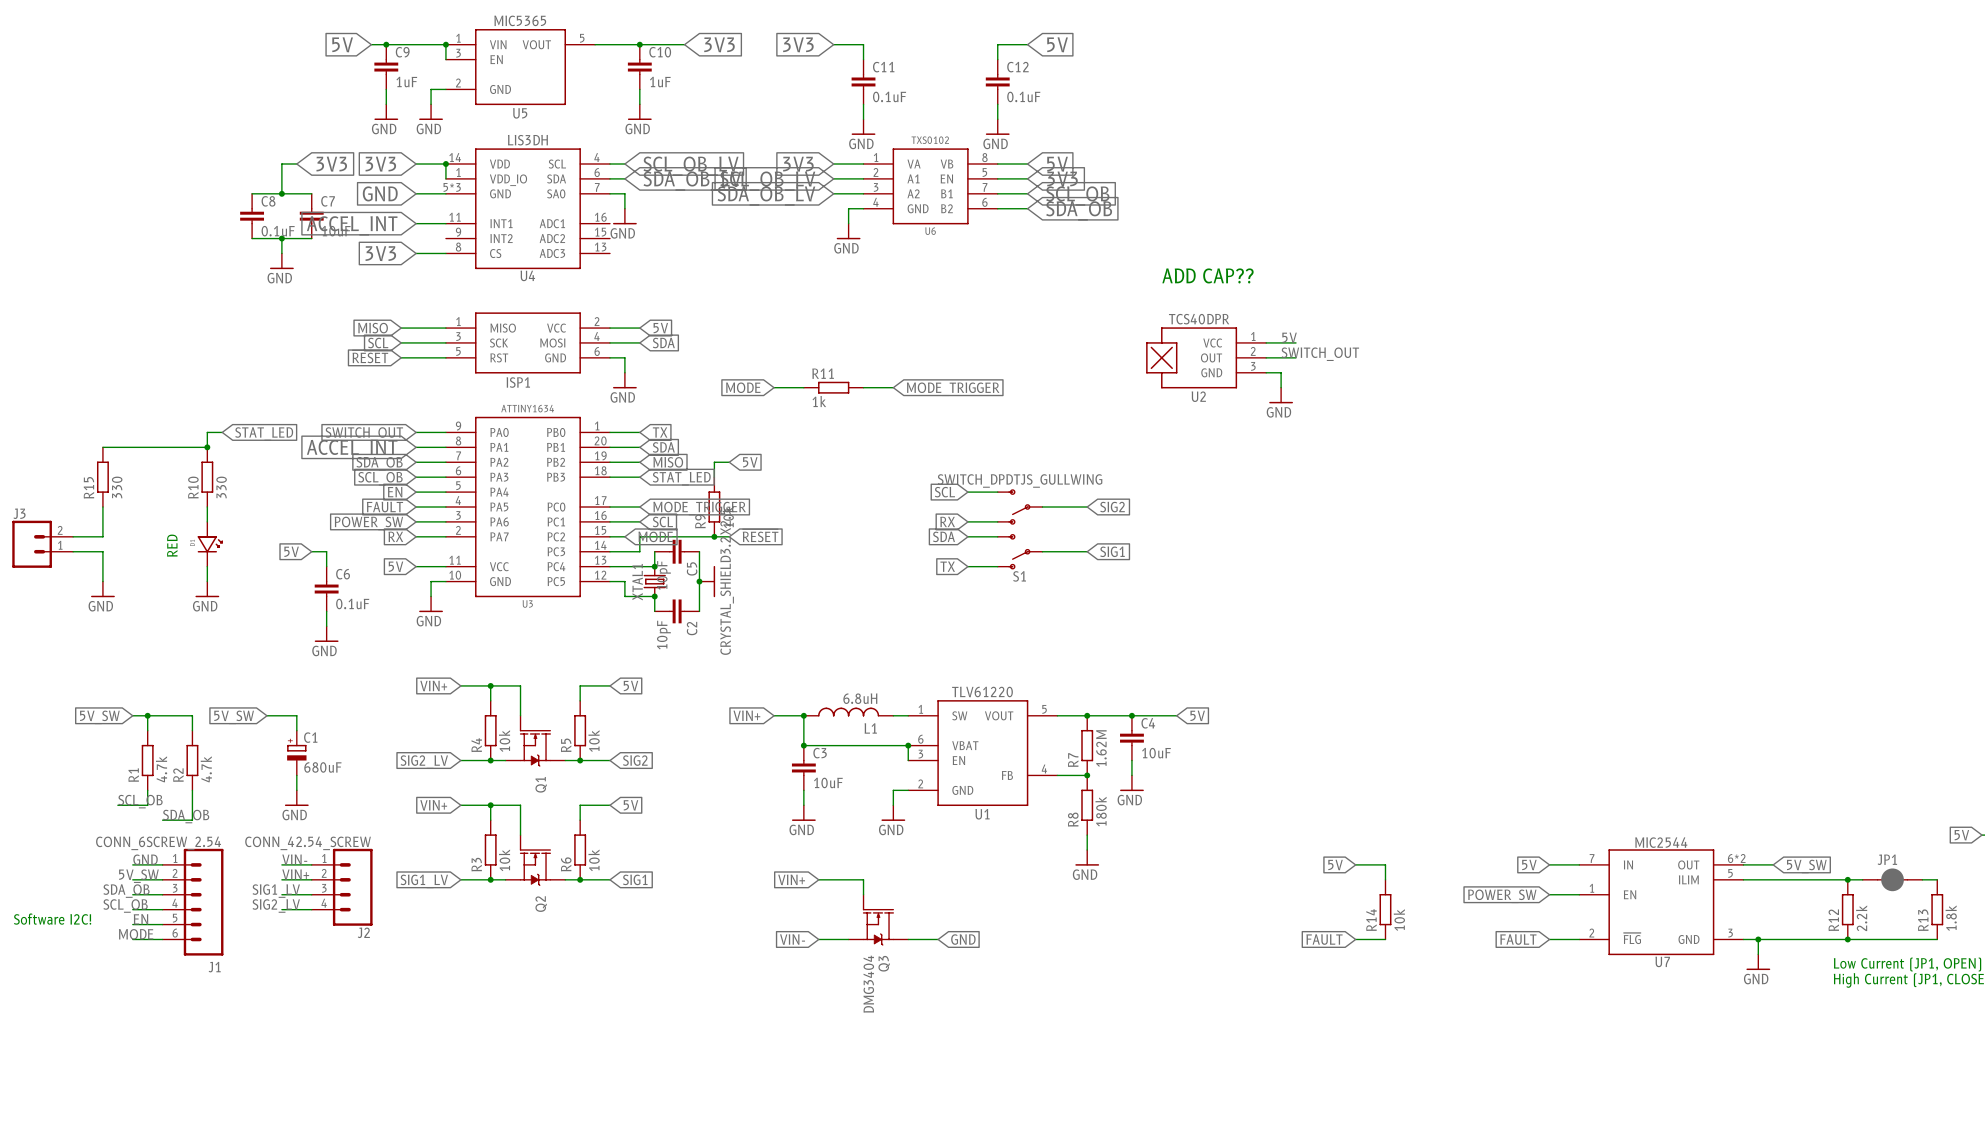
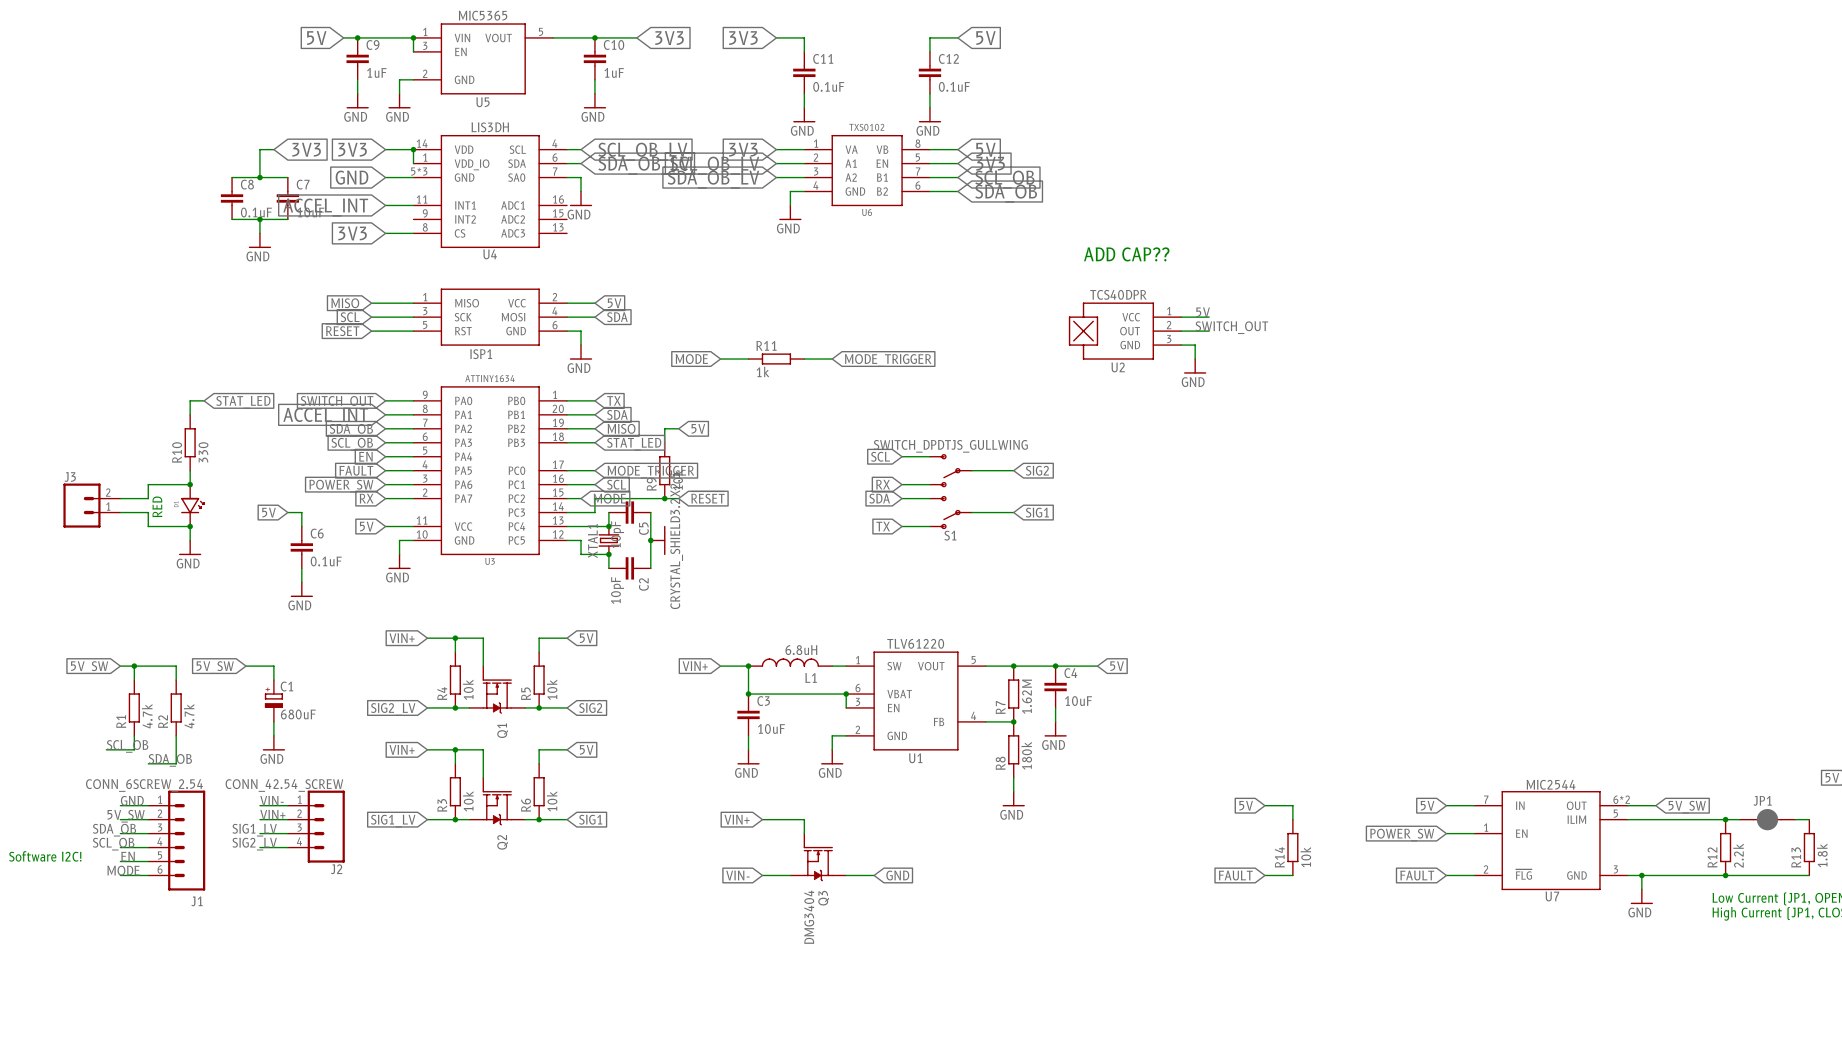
wire: (102, 447) (207, 447) -> none
junction: (207, 447) -> none
R15: 330 (102, 477) -> none
wire: (102, 507) (102, 536) (73, 536) -> none
wire: none -> (190, 484) (148, 484) (148, 498) (120, 498)
junction: none -> (190, 484)
J3 position: (42, 544) -> (91, 505)
wire: (73, 551) (102, 551) (102, 581) -> none
wire: none -> (120, 512) (148, 512) (148, 526) (190, 526)
junction: none -> (190, 526)
power symbol: GND (102, 589) -> none

